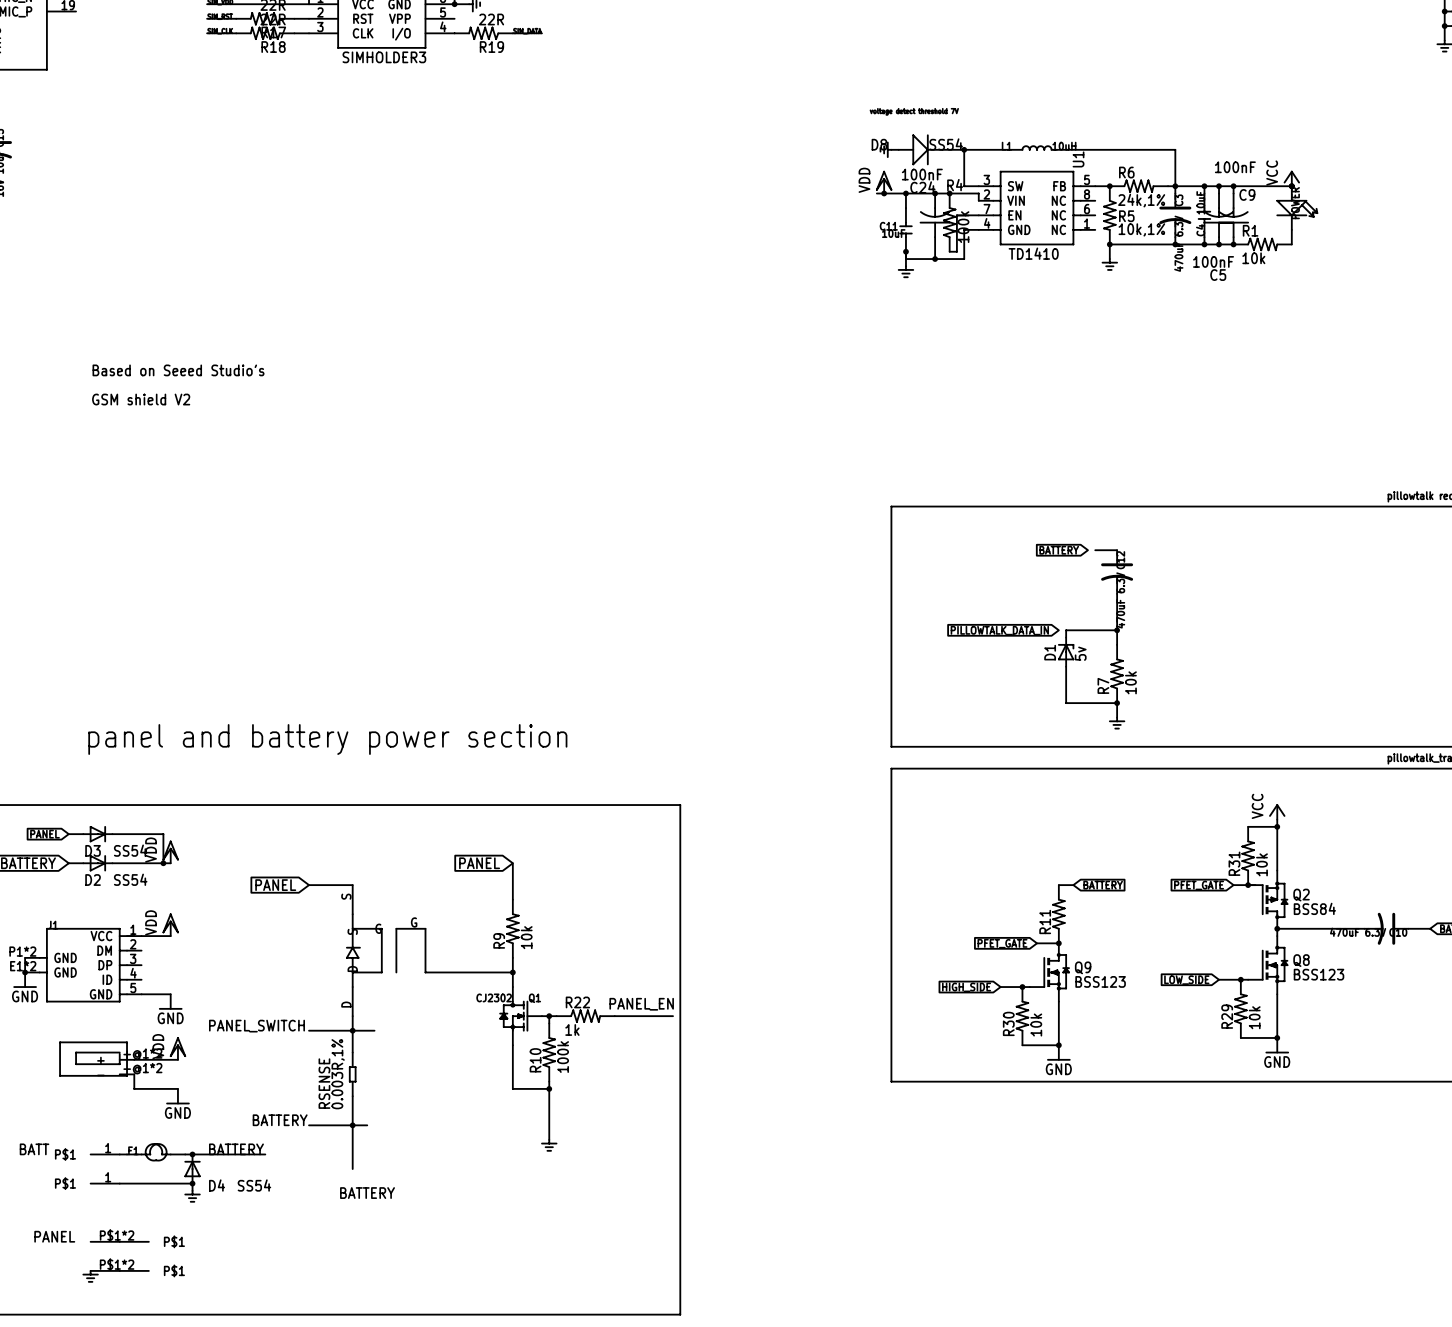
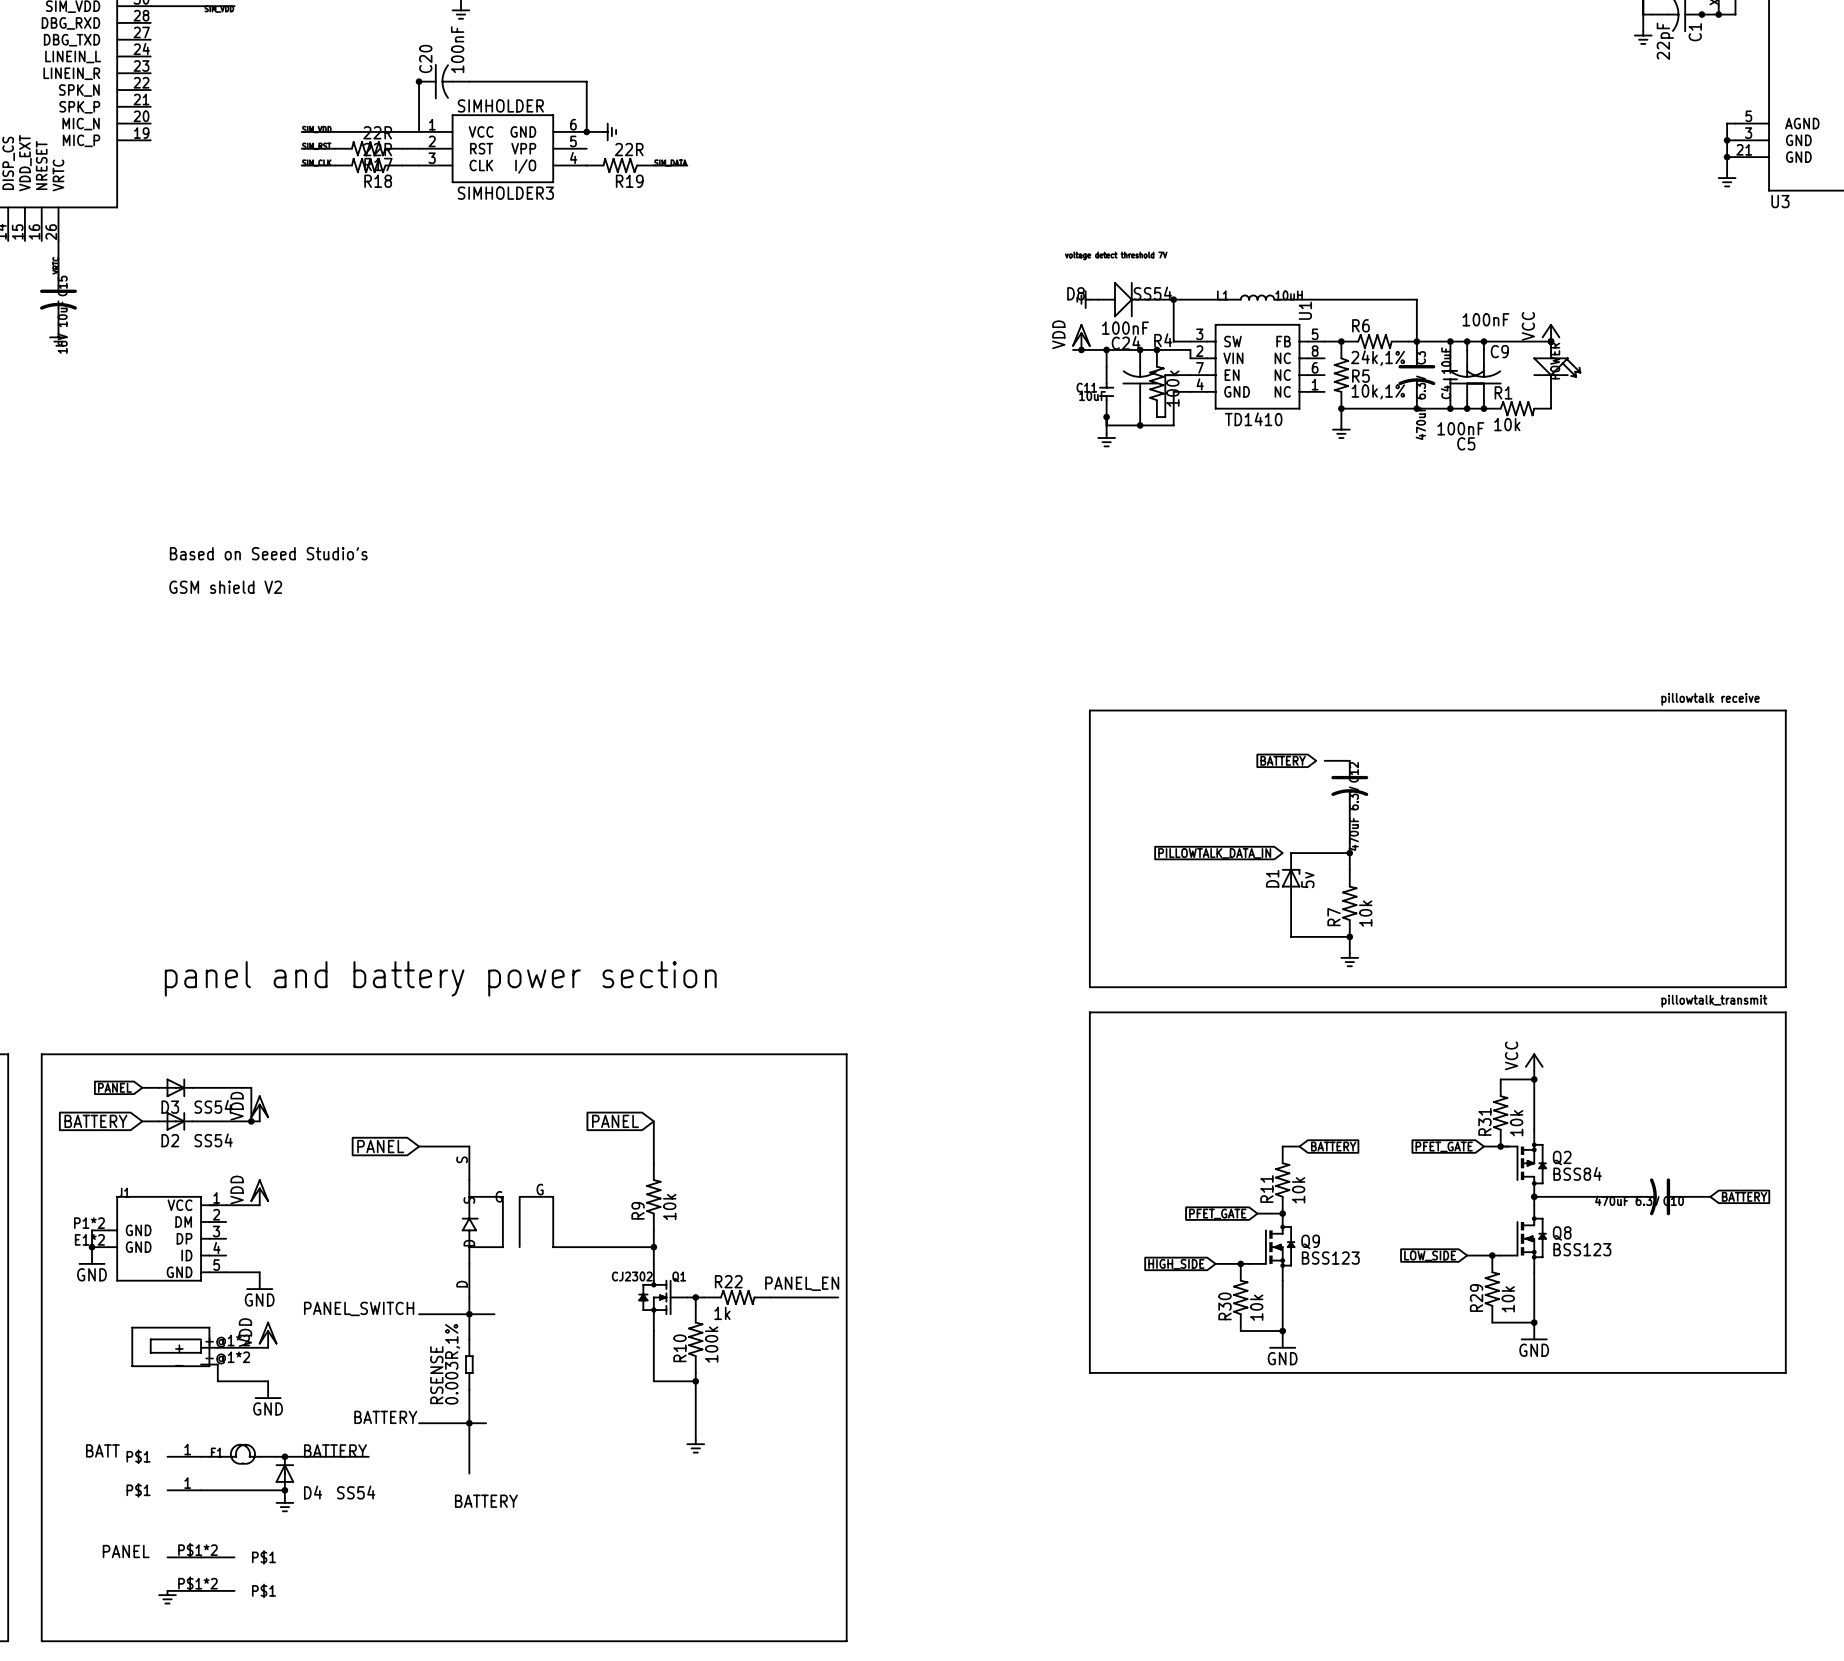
R11 value: none -> 10k (1298, 1190)

